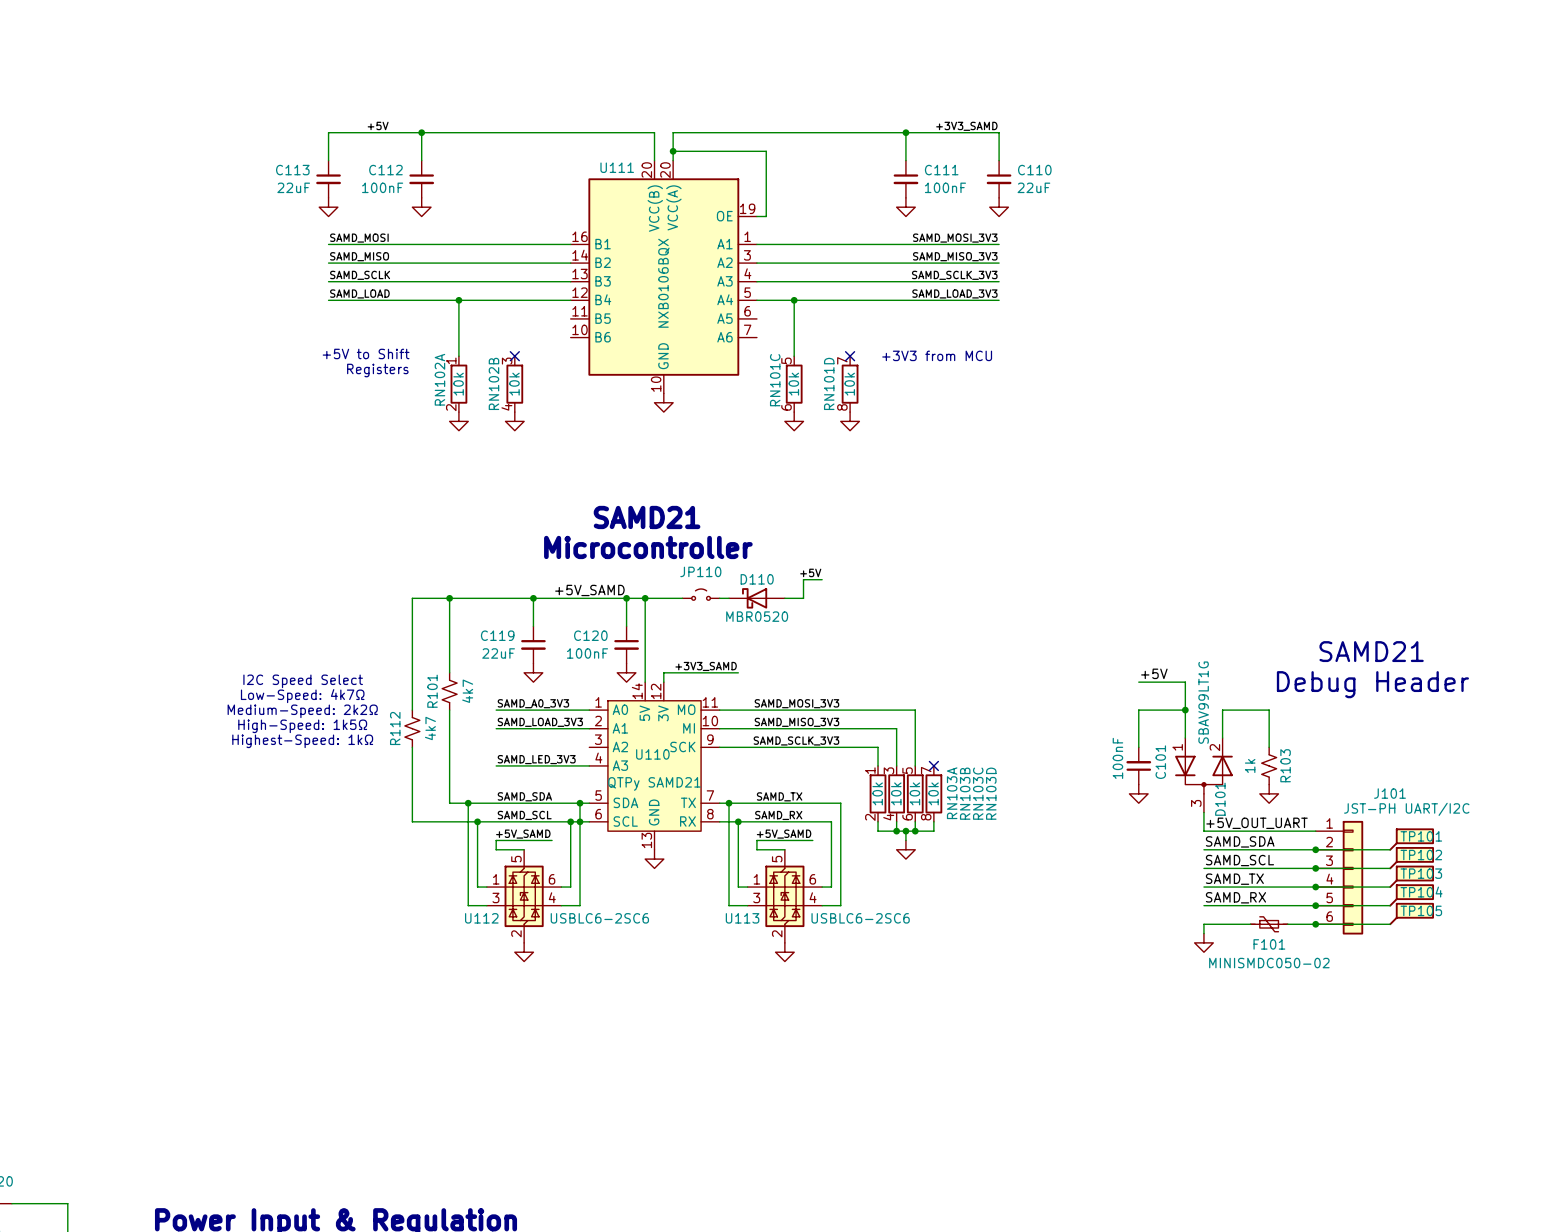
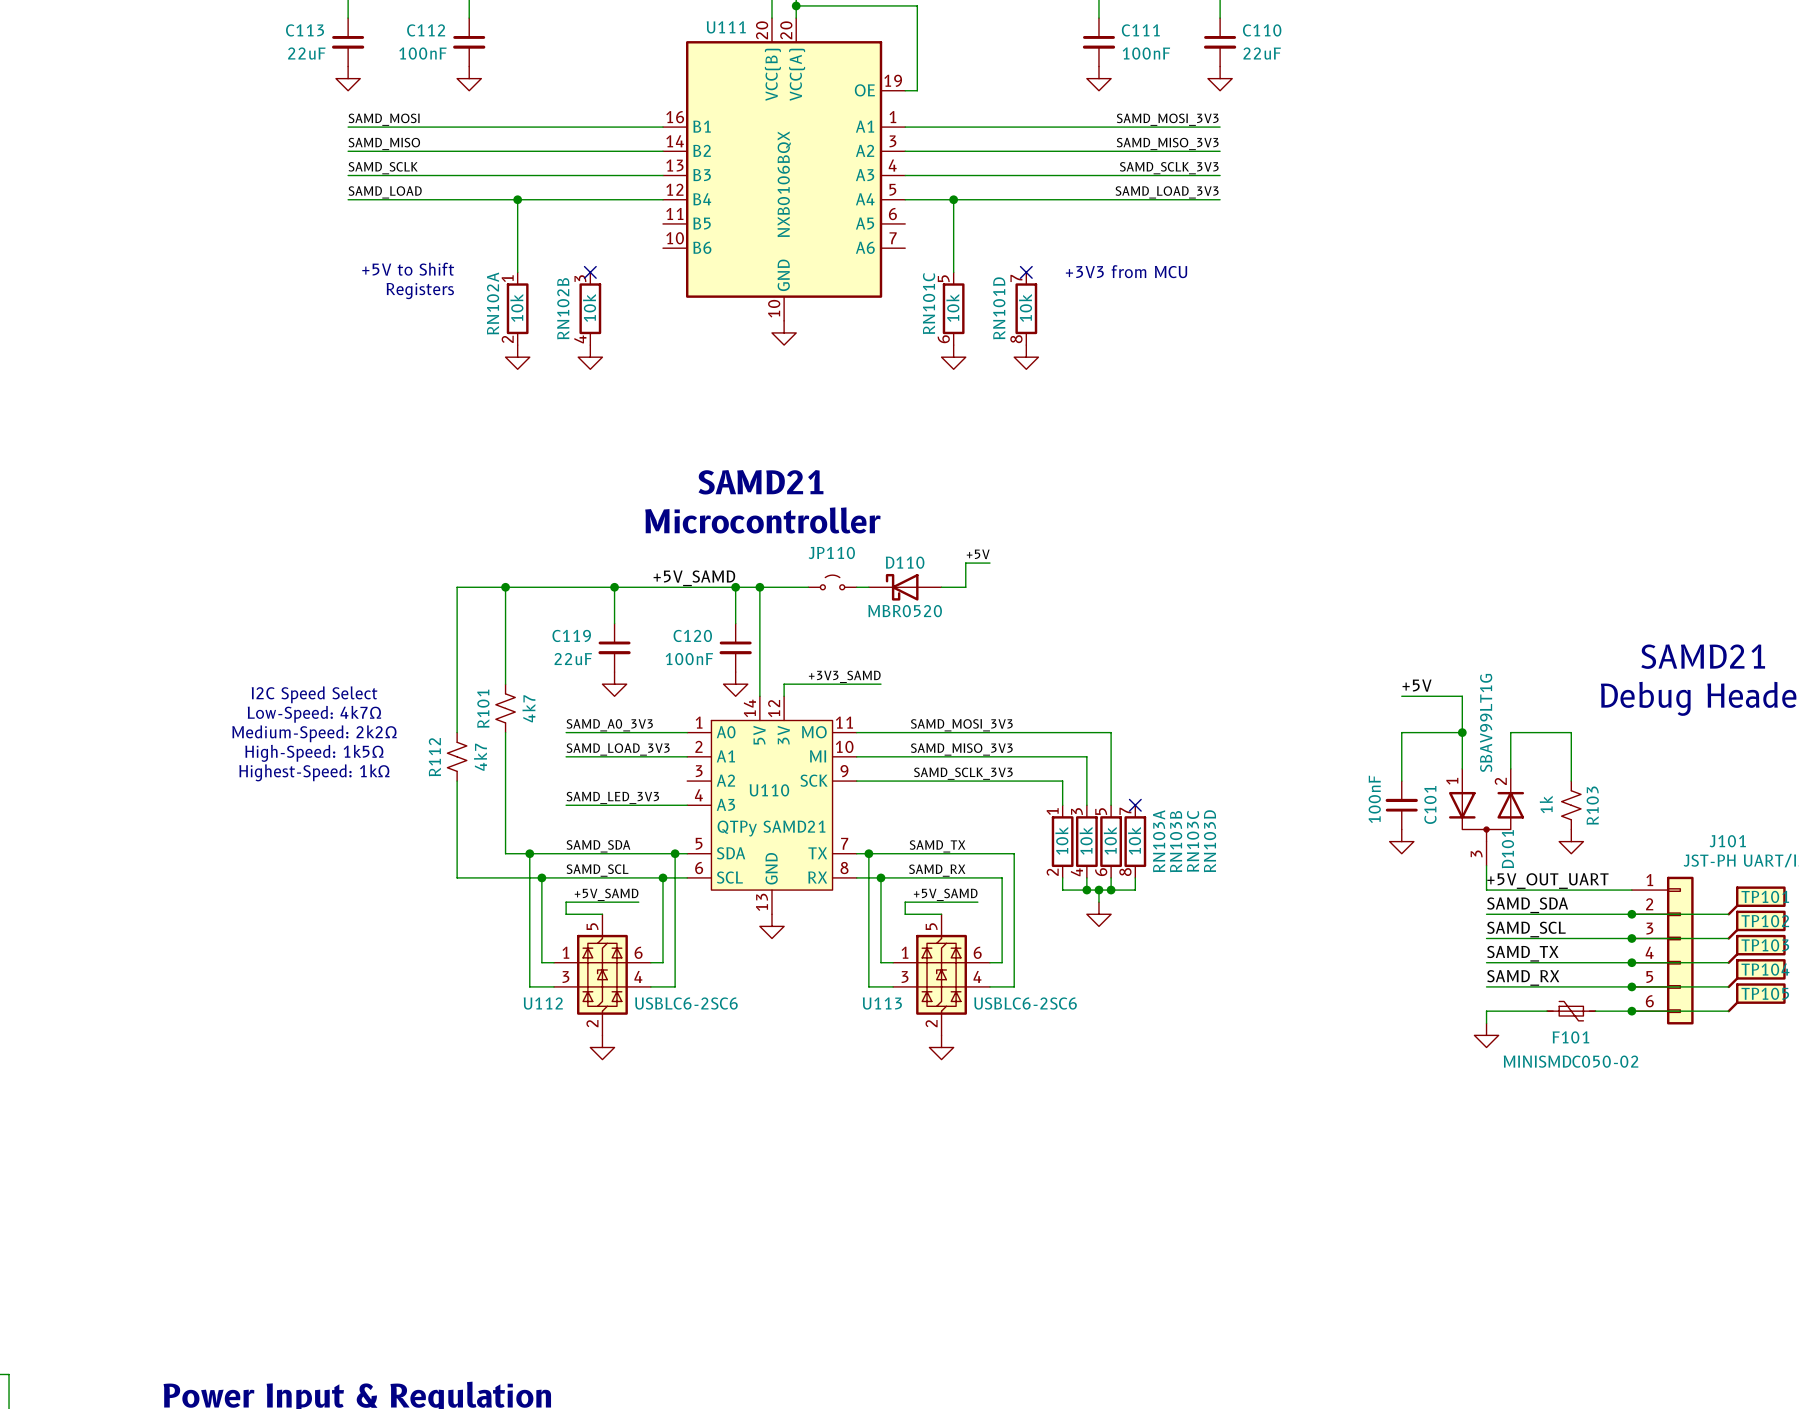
junction: (580, 821) -> none

